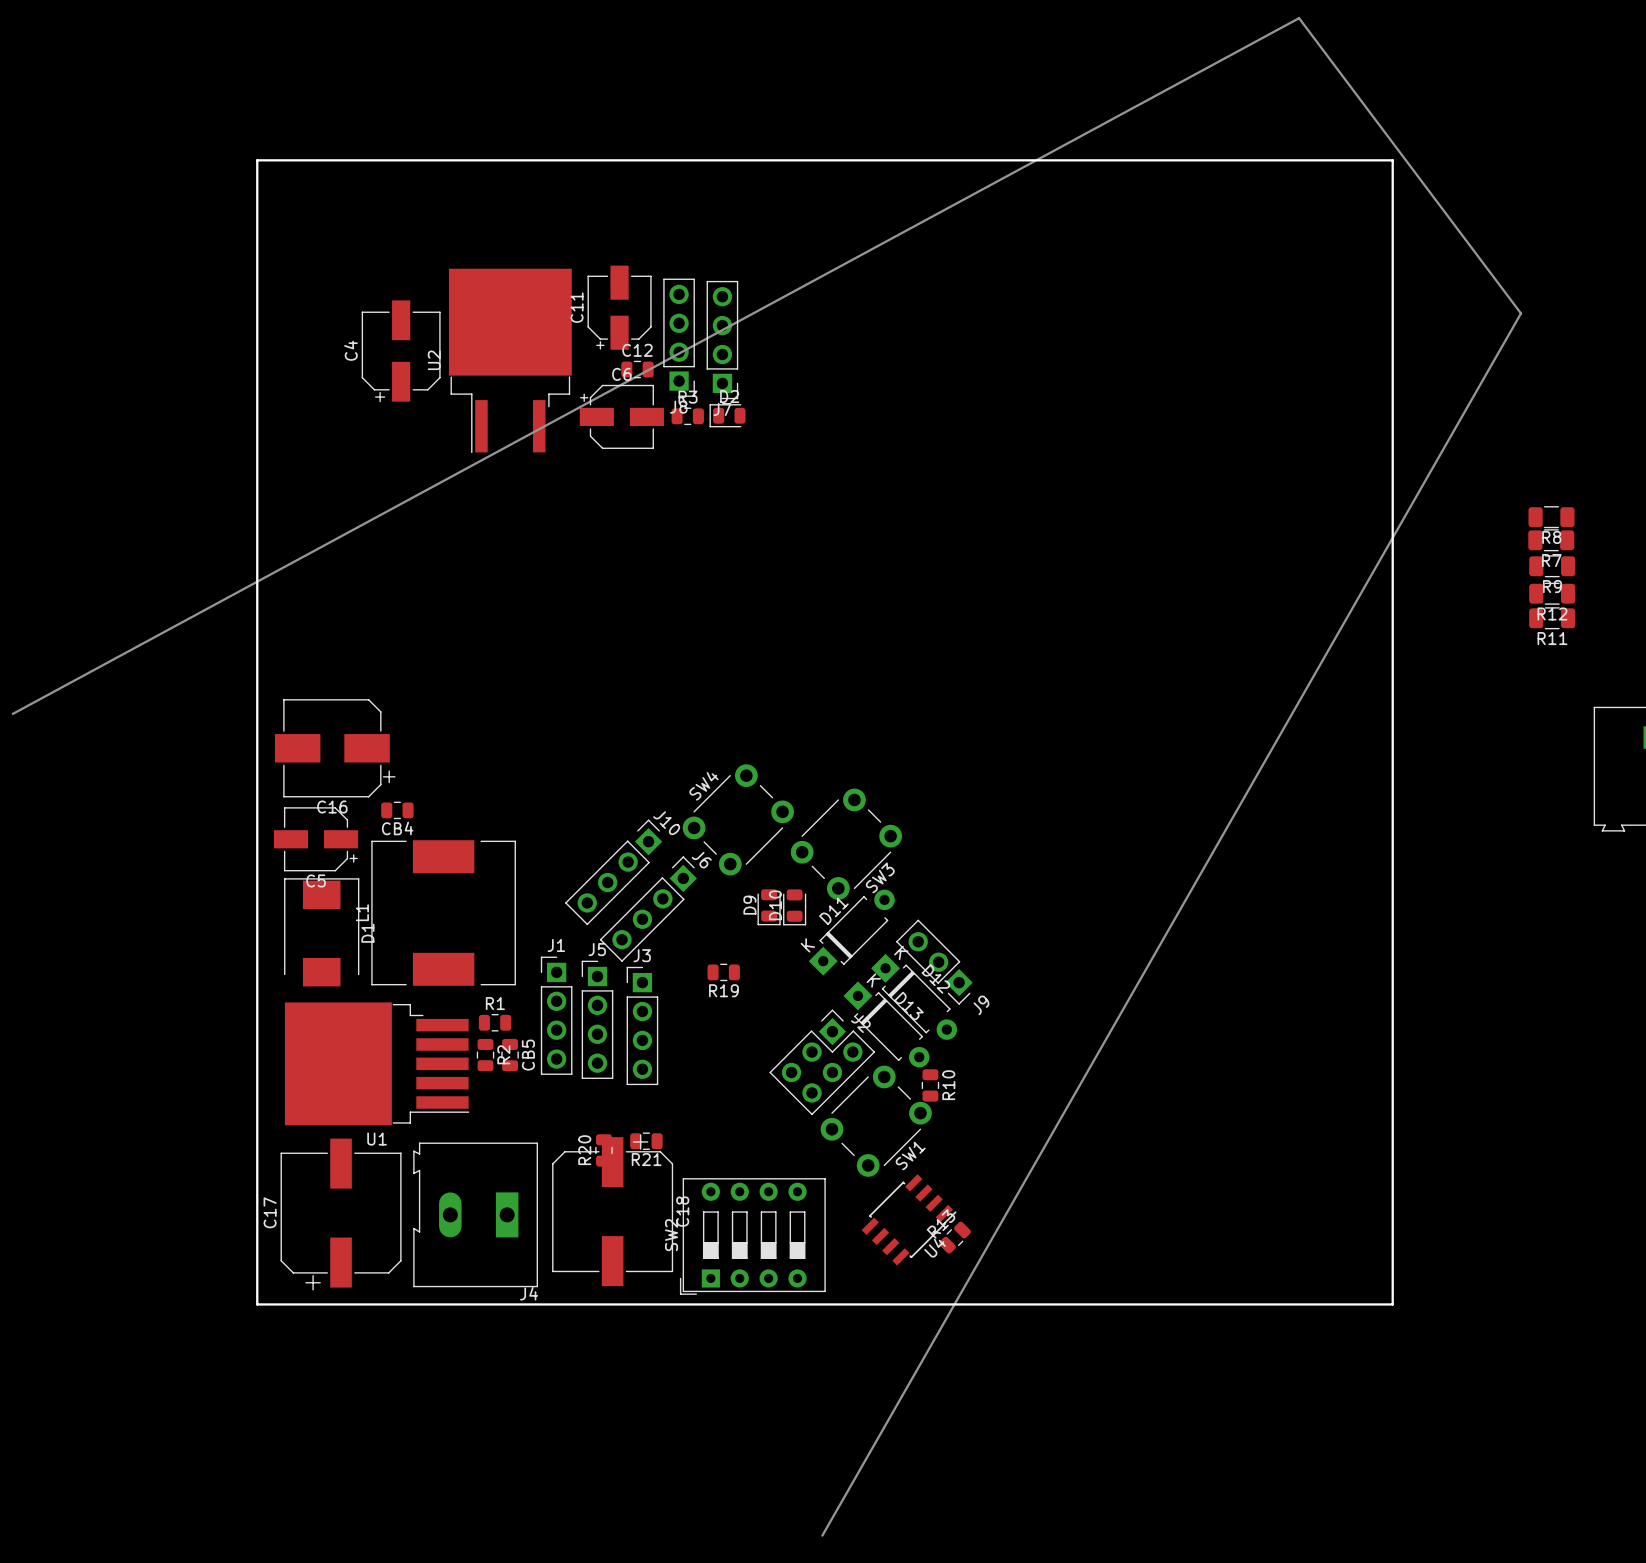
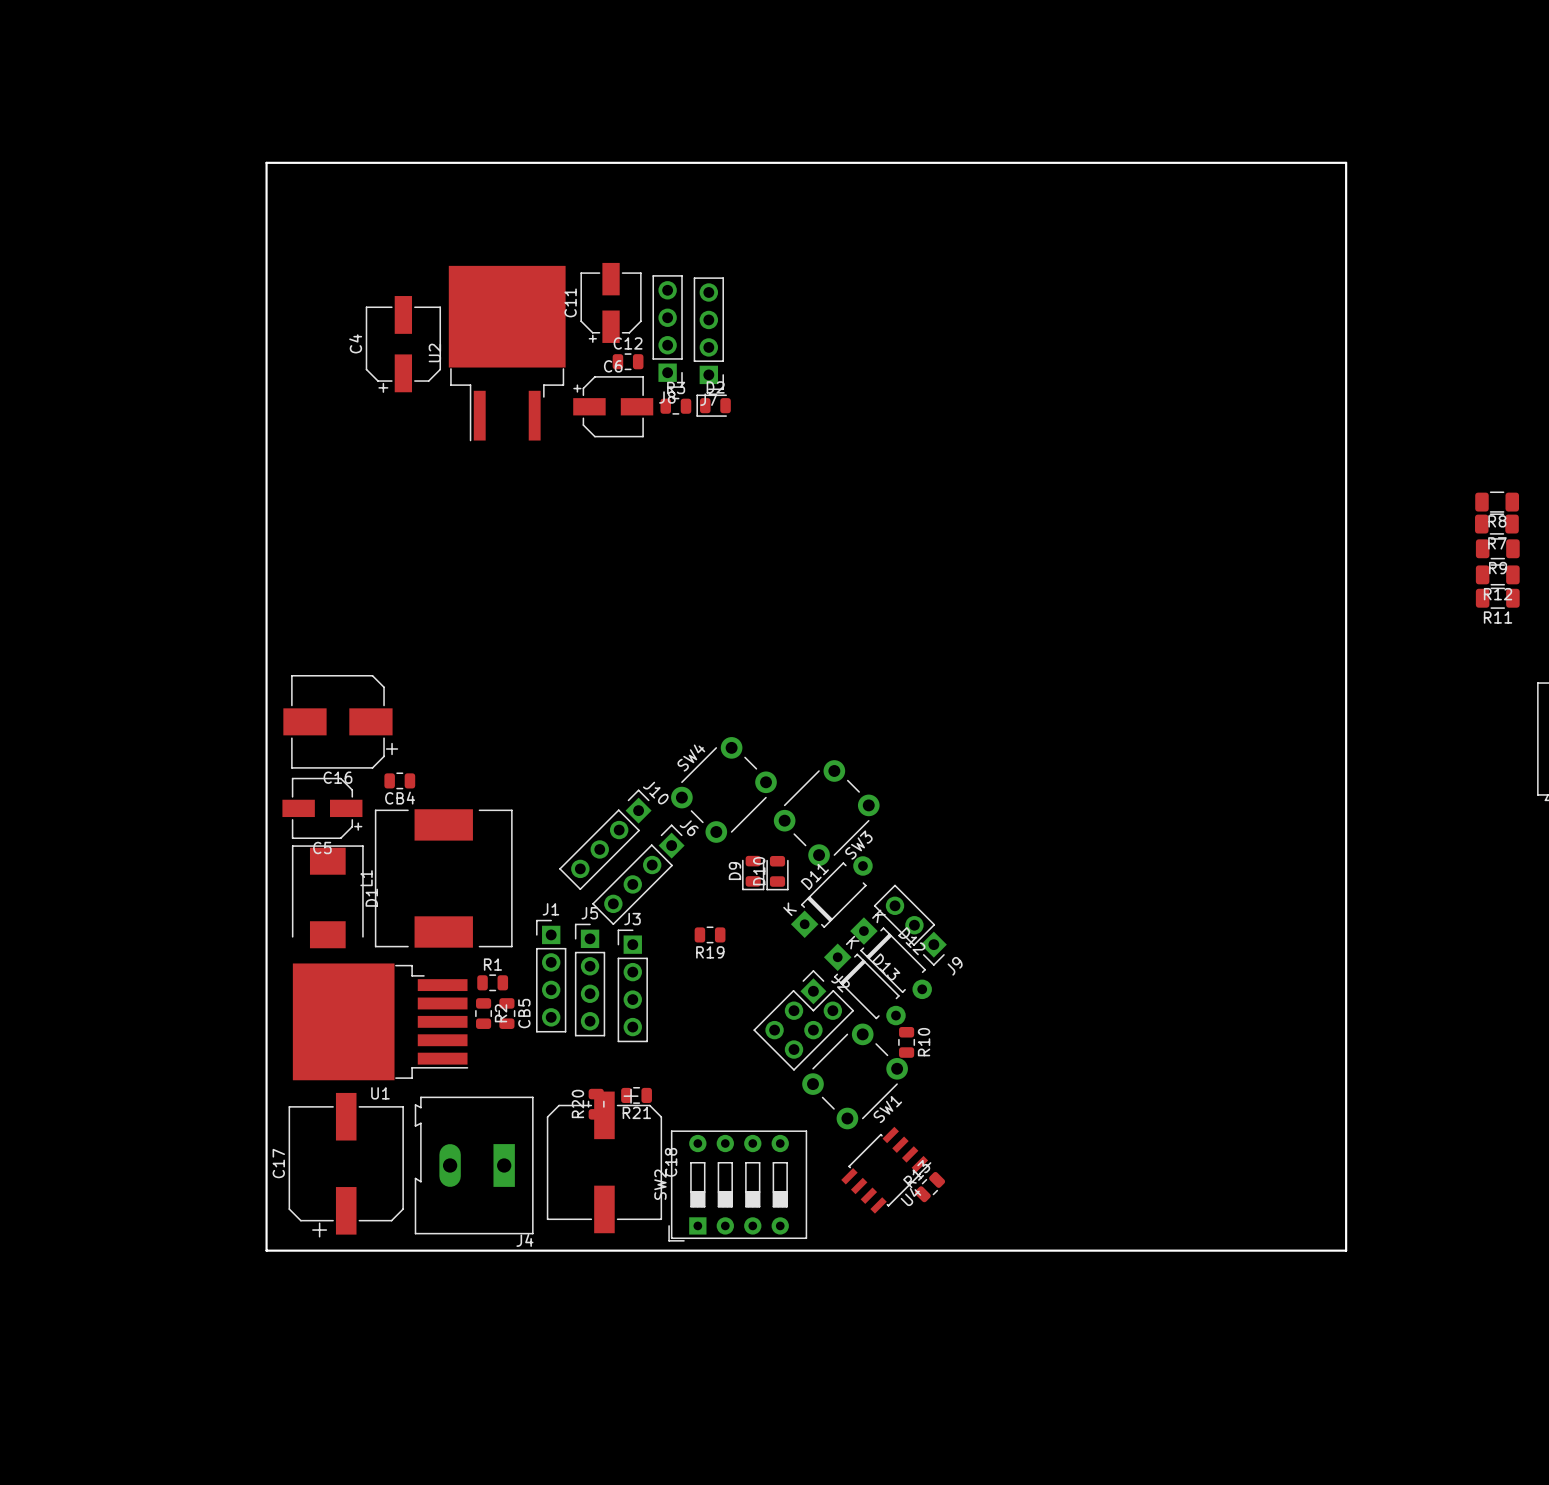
line: (12, 713) (1299, 18) (1520, 313) (822, 1535) -> none

